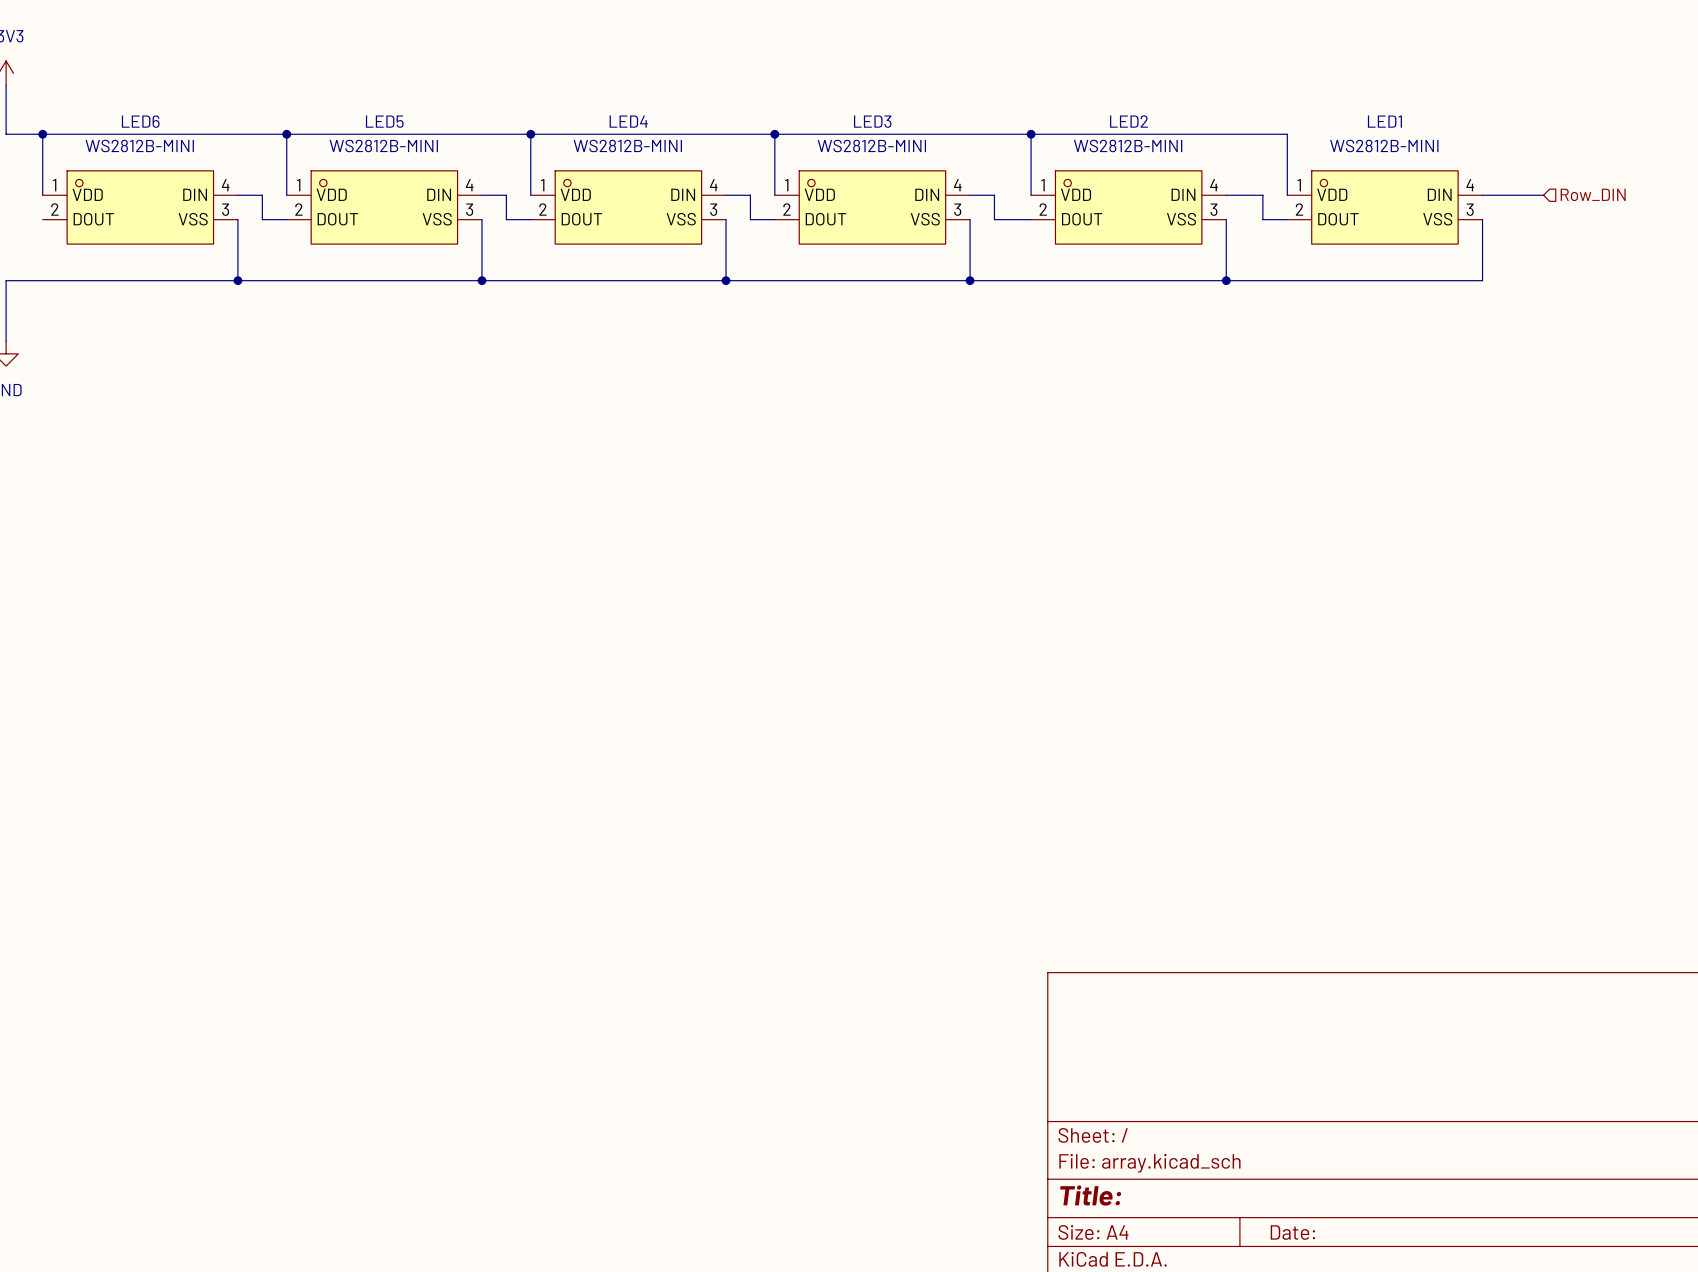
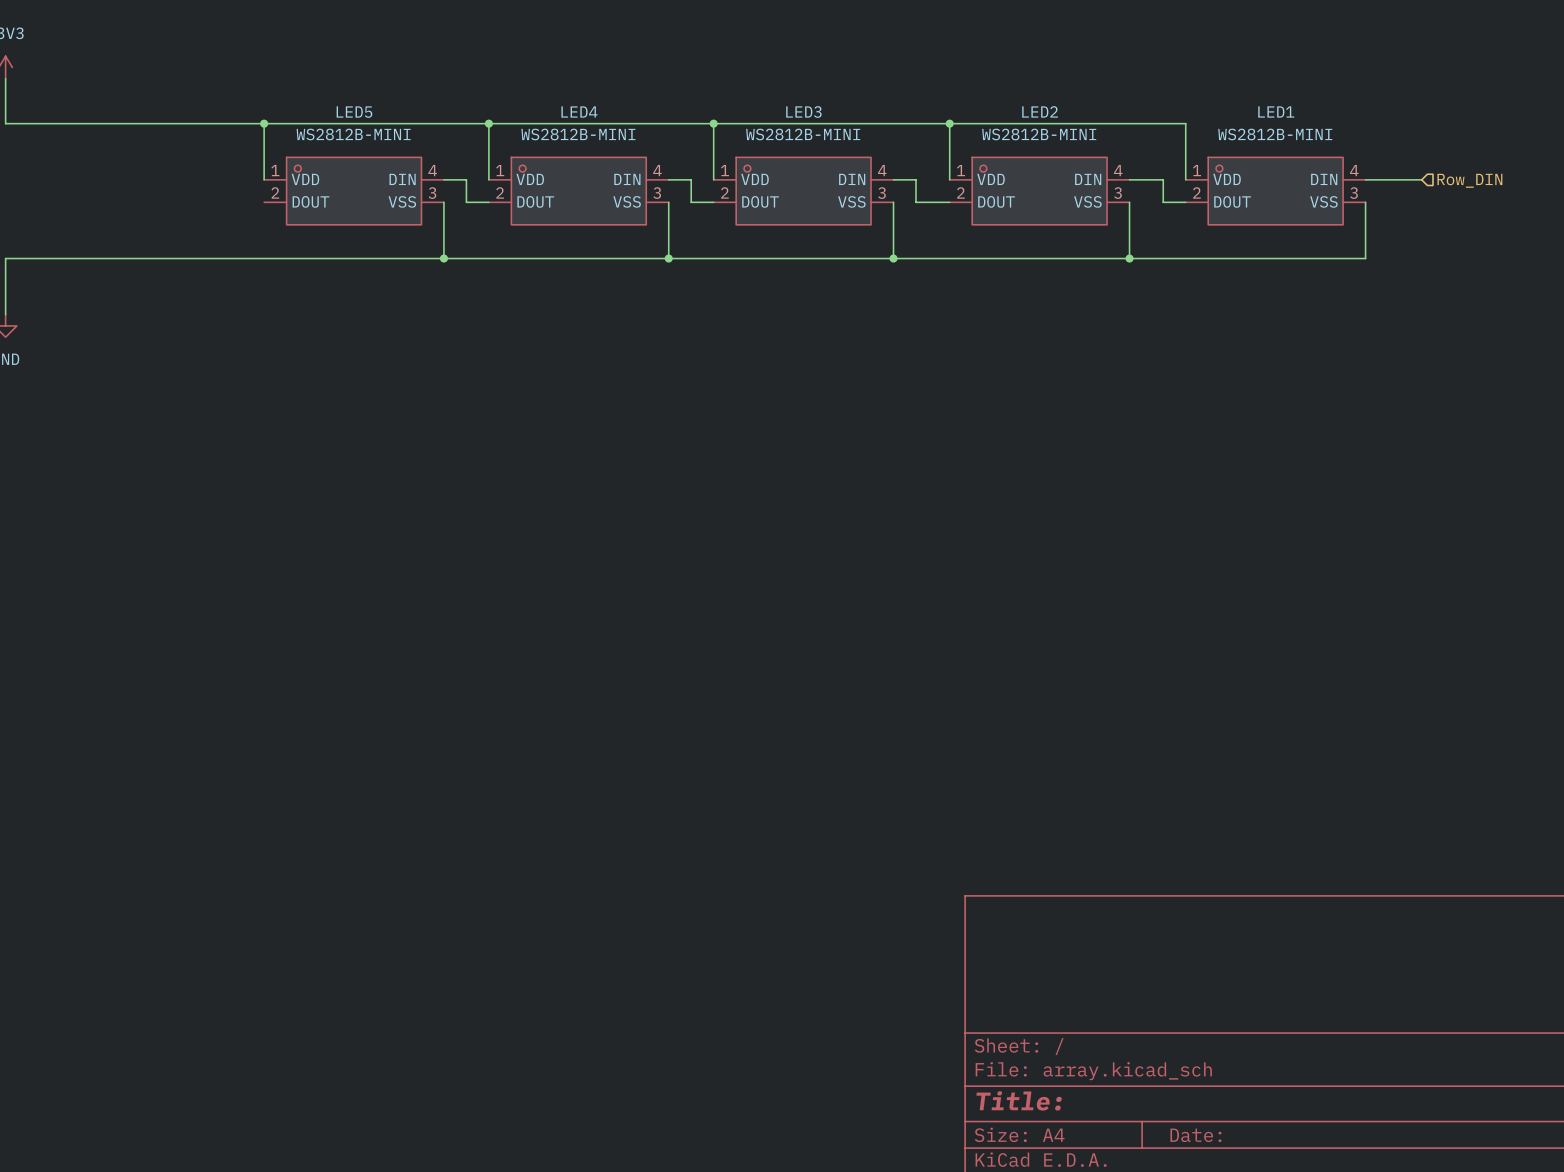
wire: (42, 134) (42, 195) -> none
junction: (42, 134) -> none
wire: (237, 195) (262, 195) (262, 219) (286, 219) -> none
LED6: WS2812B-MINI (140, 207) -> none
wire: (237, 219) (237, 280) -> none
junction: (237, 280) -> none

